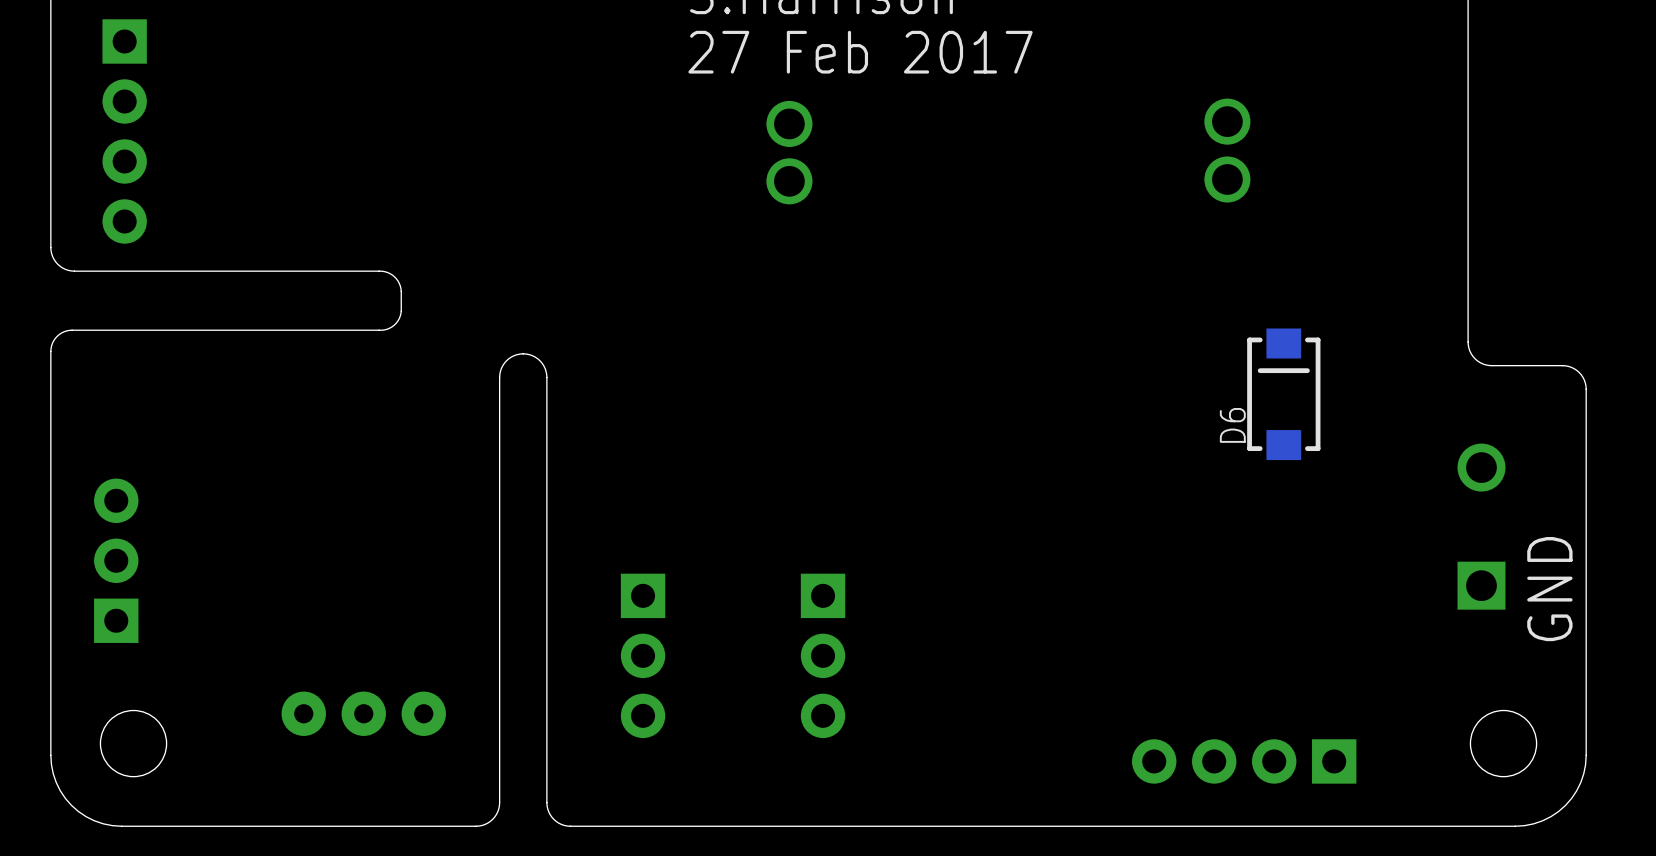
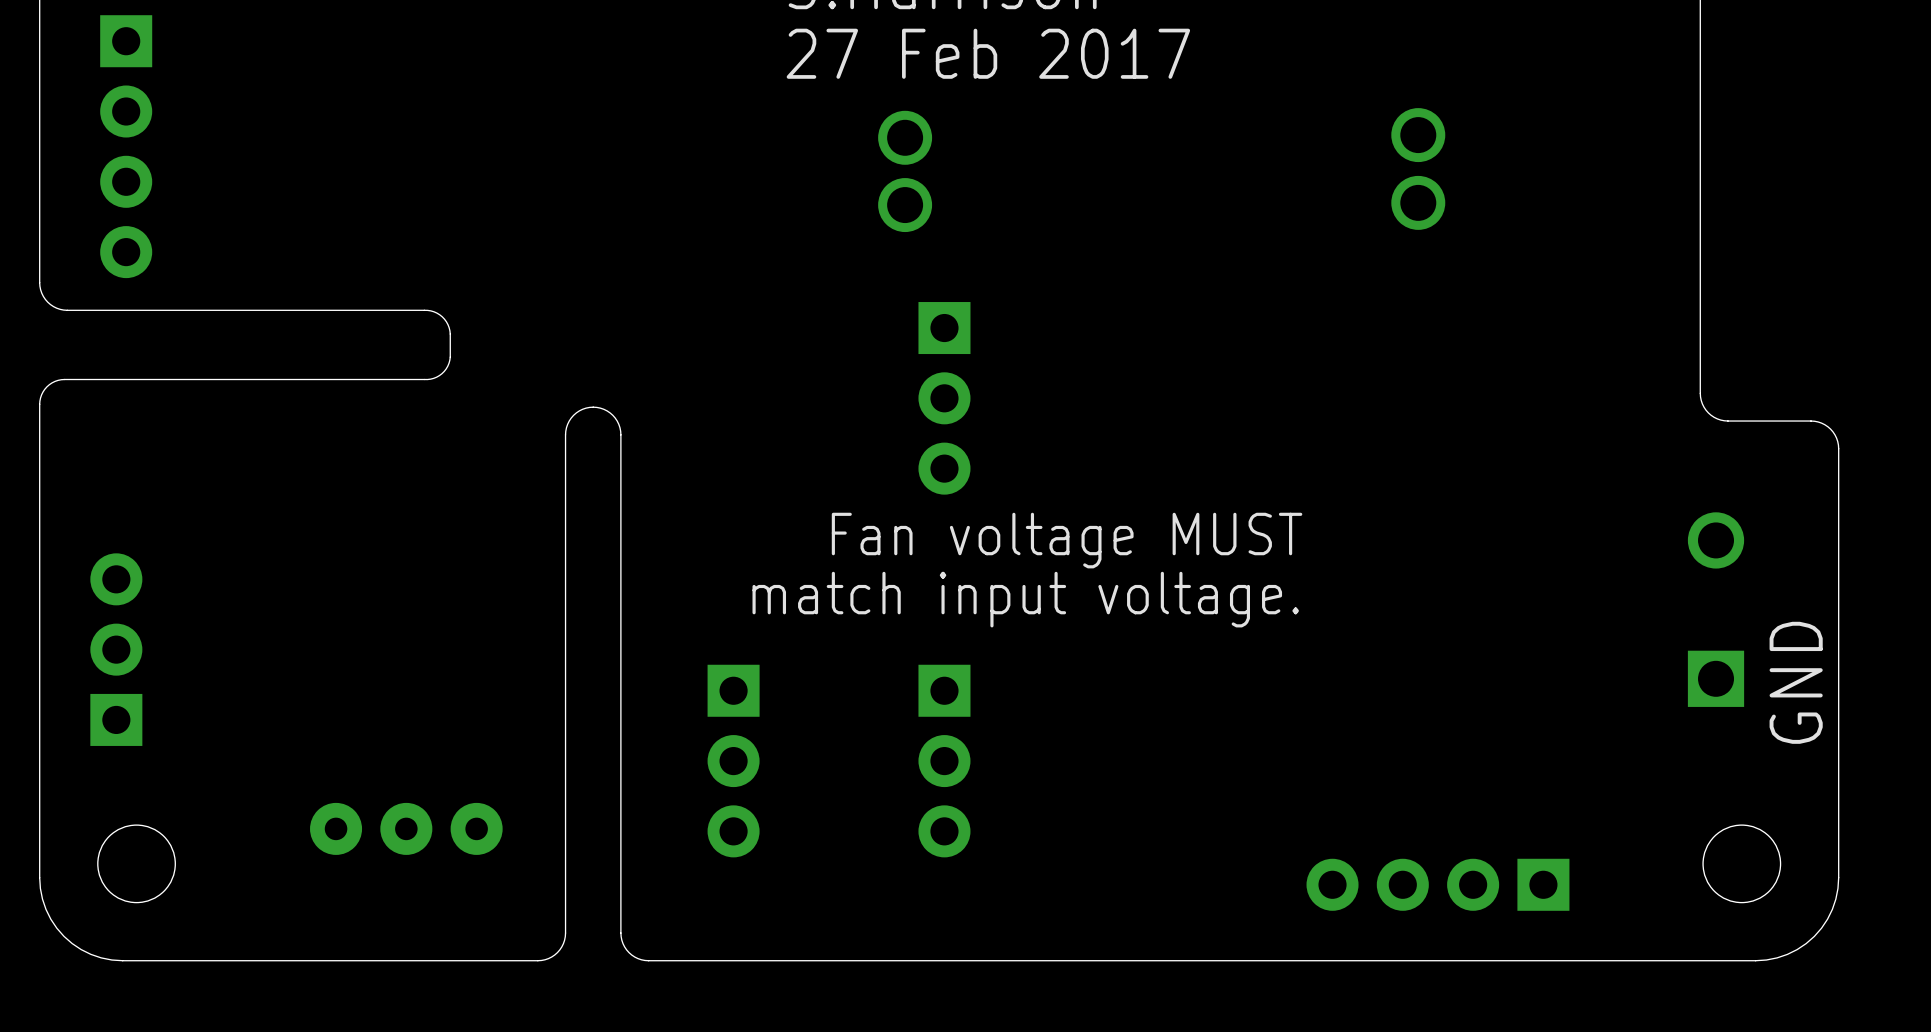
part: none -> (944, 398)
D6: (1283, 394) -> none
text: none -> Fan voltage MUST (1067, 540)
text: none -> match input voltage. (1025, 599)

